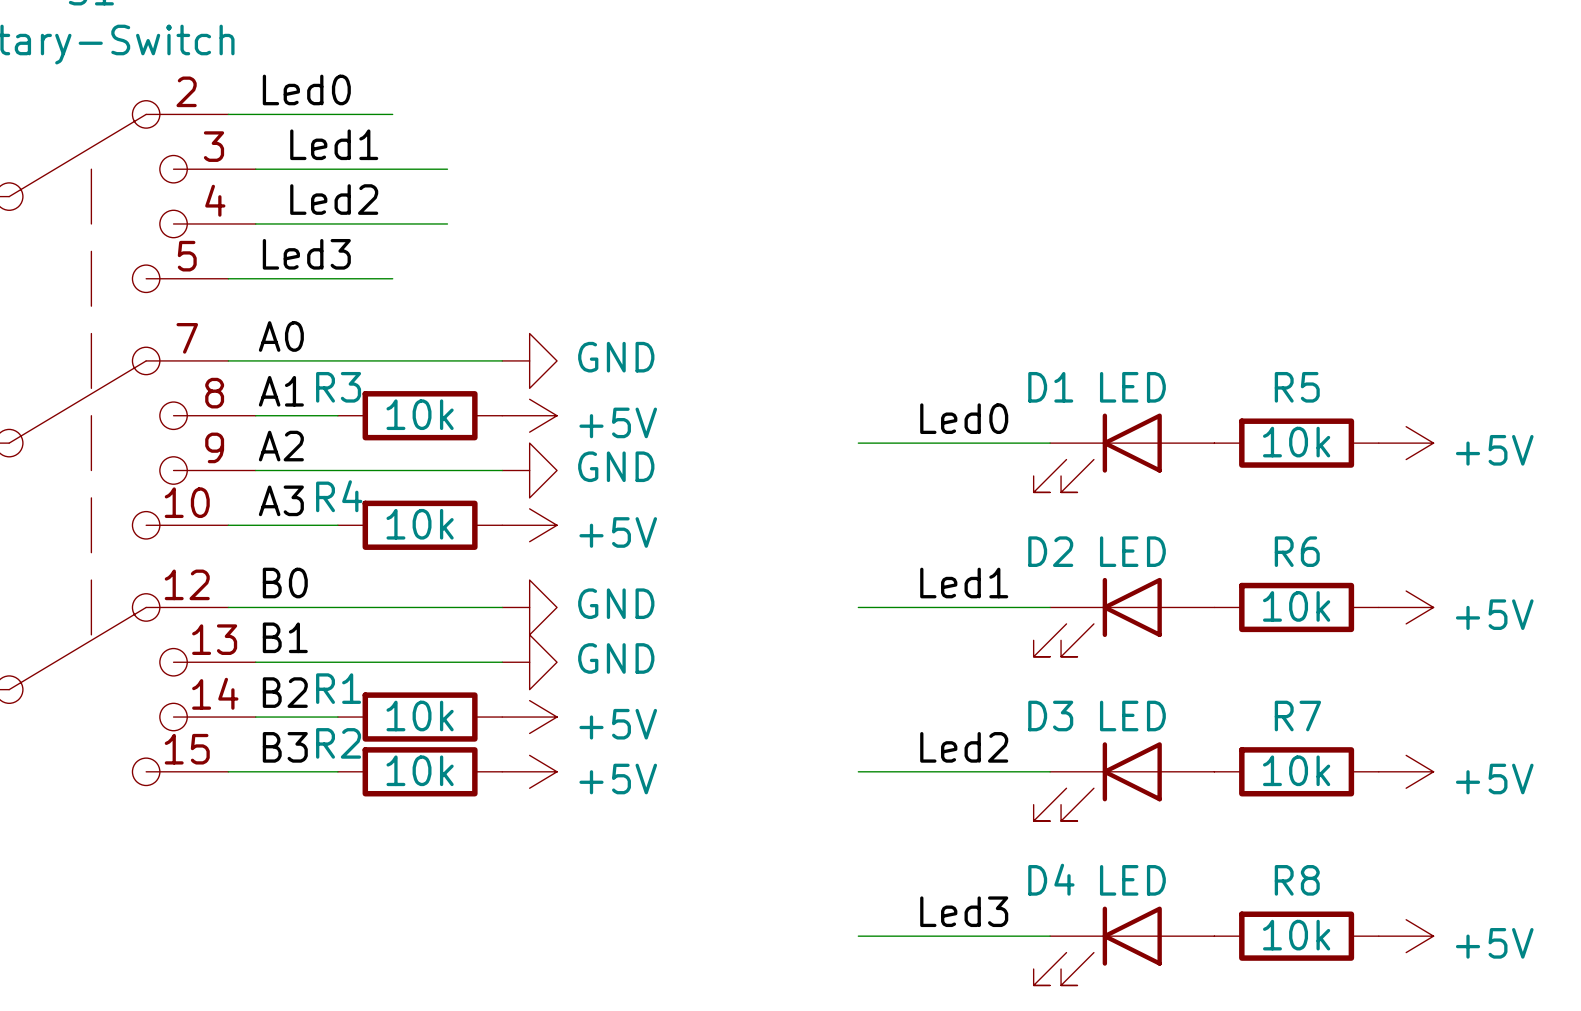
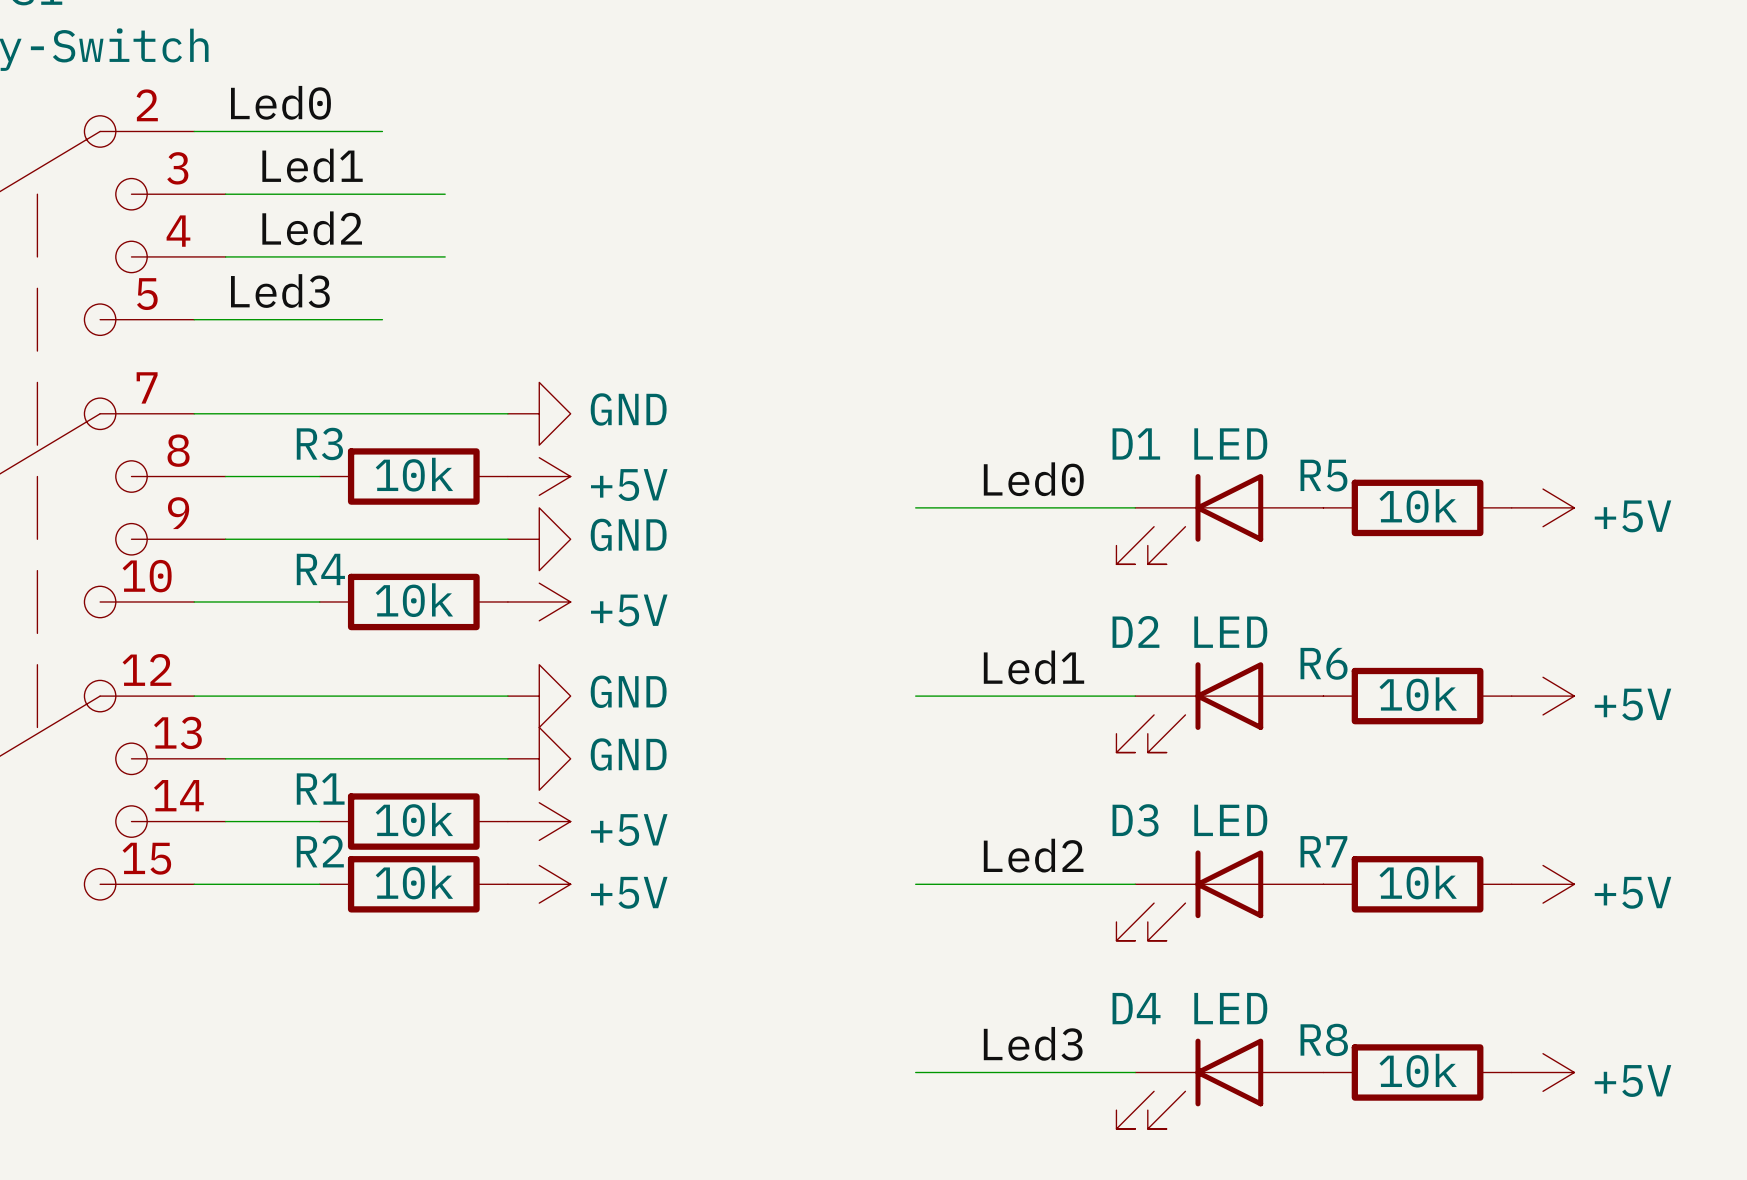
label: A0 (281, 336) -> none
R5 name position: R5 (1297, 387) -> R5 (1323, 475)
label: A1 (281, 391) -> none
label: A2 (281, 446) -> none
label: A3 (281, 500) -> none
R6 name position: R6 (1297, 551) -> R6 (1324, 663)
label: B0 (285, 583) -> none
label: B1 (285, 637) -> none
label: B2 (285, 692) -> none
R7 name position: R7 (1297, 716) -> R7 (1323, 851)
label: B3 (285, 747) -> none
R8 name position: R8 (1297, 880) -> R8 (1324, 1039)

